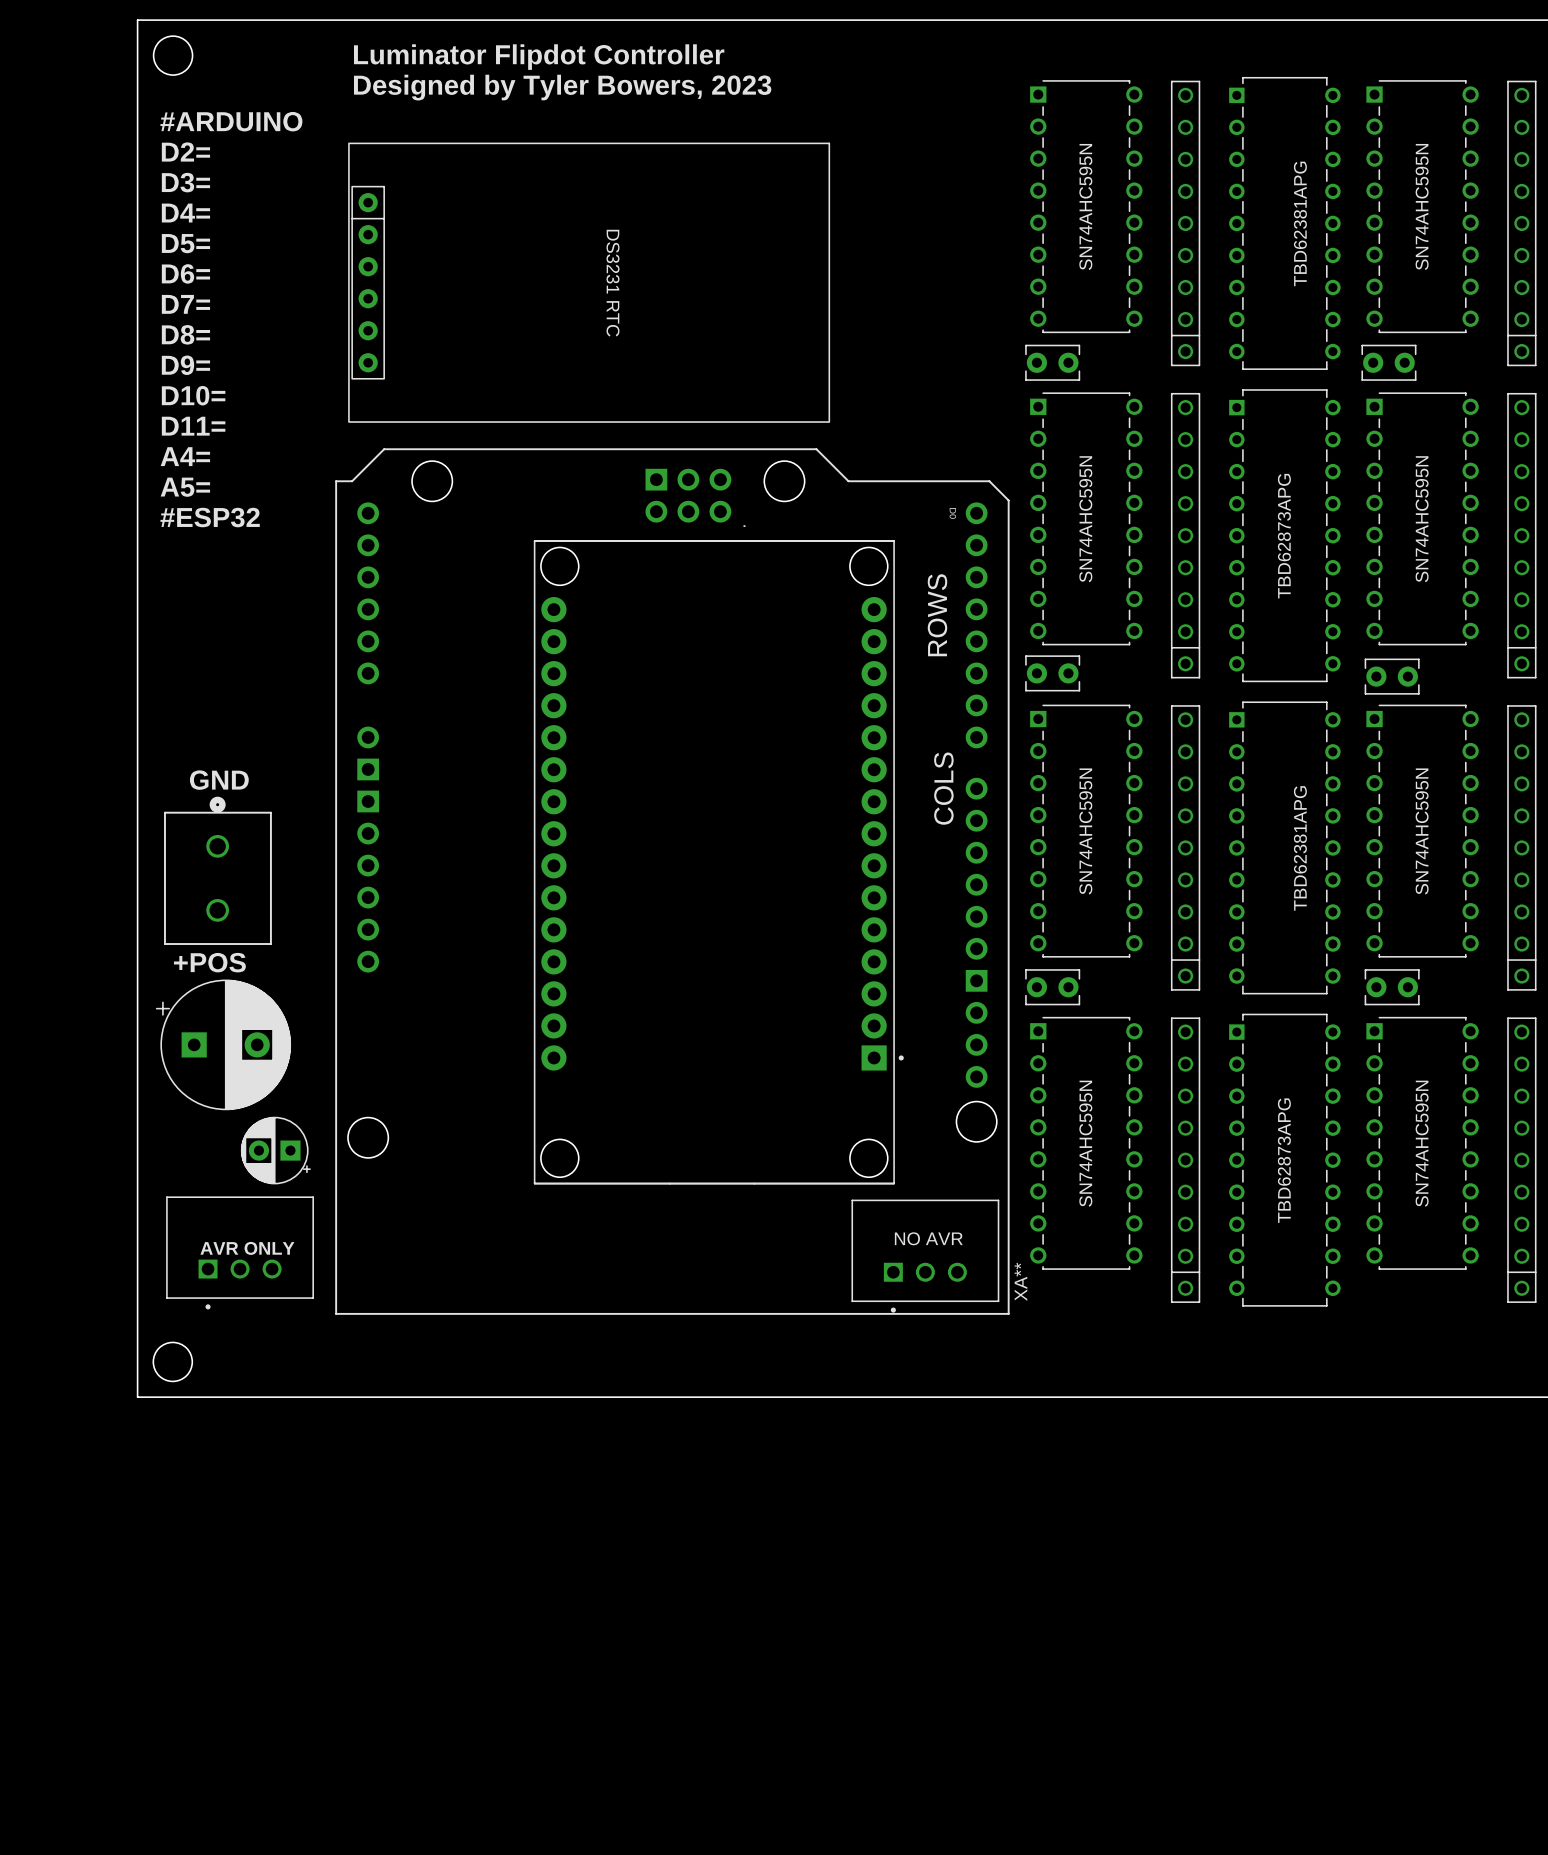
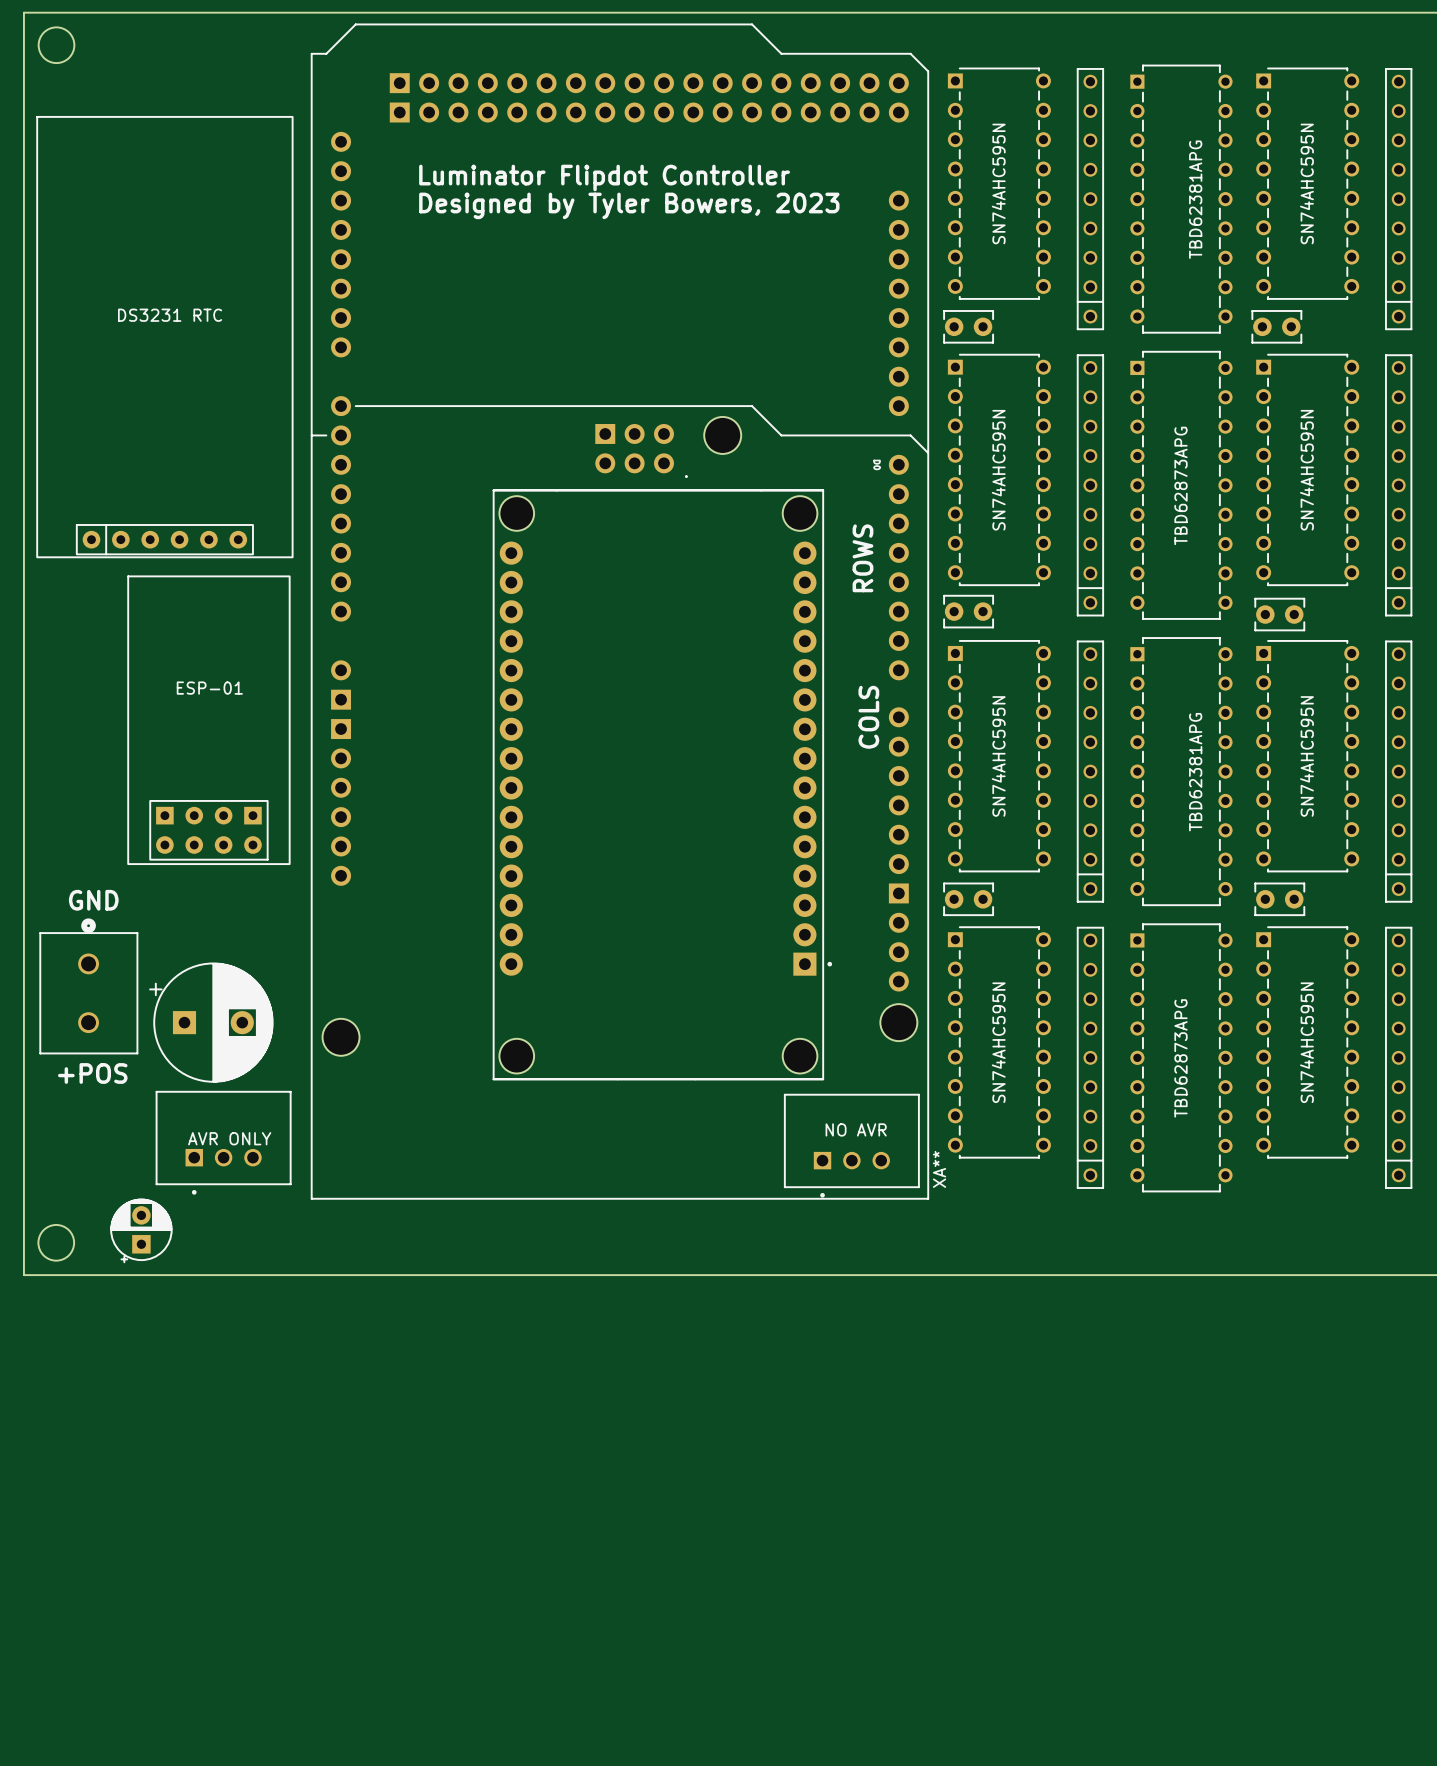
board edge: (137, 20) (137, 1397) -> (129, 12) (23, 12) (23, 1275) (129, 1275)
round board edge position: (173, 55) -> (56, 45)
text position: Luminator Flipdot Controller (539, 57) -> Luminator Flipdot Controller (604, 177)
text position: Designed by Tyler Bowers, 2023 (562, 87) -> Designed by Tyler Bowers, 2023 (629, 205)
text: #ARDUINO (231, 121) -> none
text: D2= (185, 151) -> none
text: D3= (185, 182) -> none
text: D4= (185, 213) -> none
text: D5= (185, 243) -> none
text: D6= (185, 273) -> none
part: (589, 282) -> none
text: D7= (185, 304) -> none
text: D8= (185, 334) -> none
text: D9= (185, 365) -> none
part: none -> (164, 337)
text: D10= (193, 395) -> none
text: D11= (193, 426) -> none
text: A4= (185, 456) -> none
text: A5= (185, 487) -> none
text: #ESP32 (210, 517) -> none
XA**: none -> (619, 611)
text position: GND (219, 780) -> GND (93, 900)
part: none -> (208, 720)
part position: (217, 870) -> (88, 986)
XA**: (672, 881) -> none
text position: +POS (209, 962) -> +POS (92, 1073)
part position: (223, 1044) -> (211, 1022)
part rotation: 0° (275, 1150) -> 90° clockwise (141, 1230)
part position: (275, 1150) -> (141, 1230)
round board edge position: (172, 1361) -> (56, 1242)

